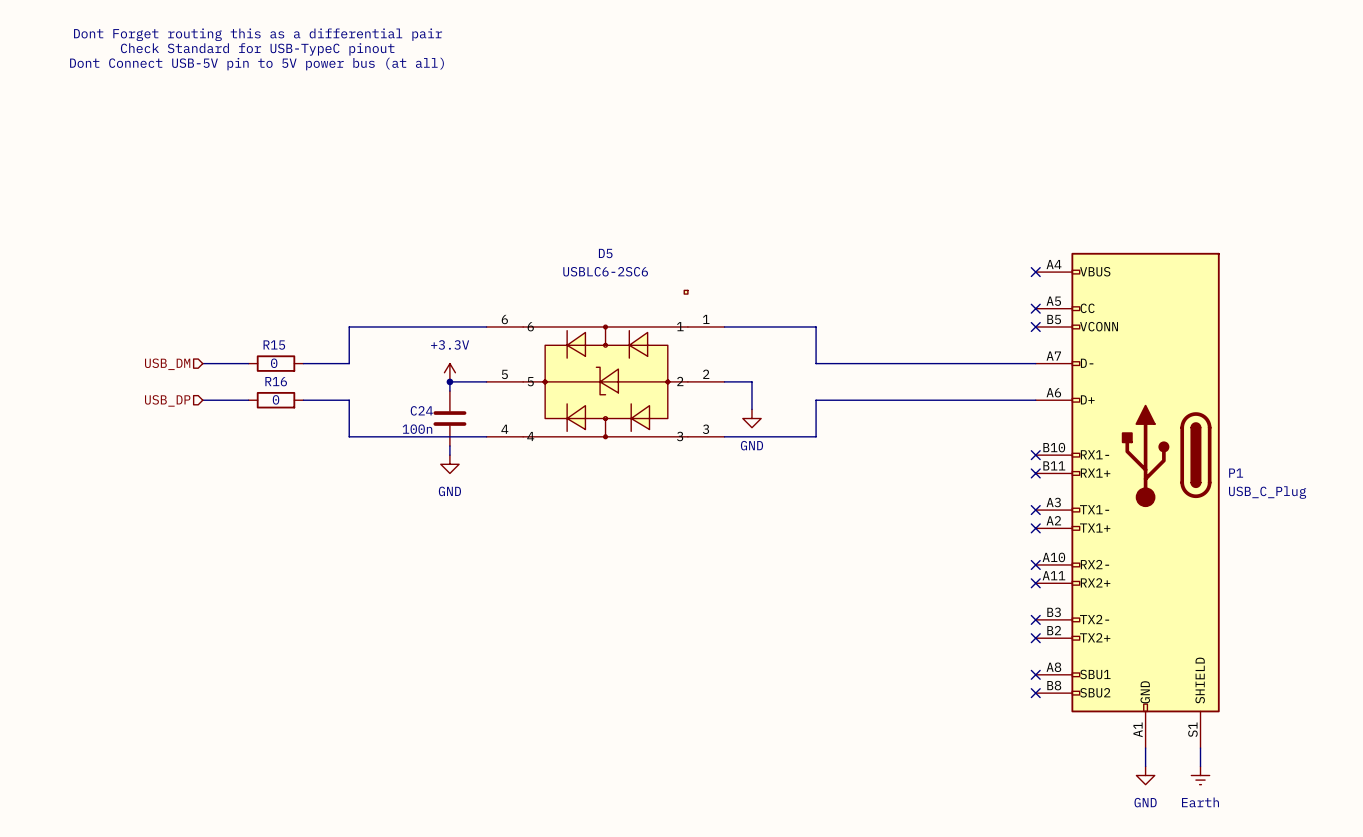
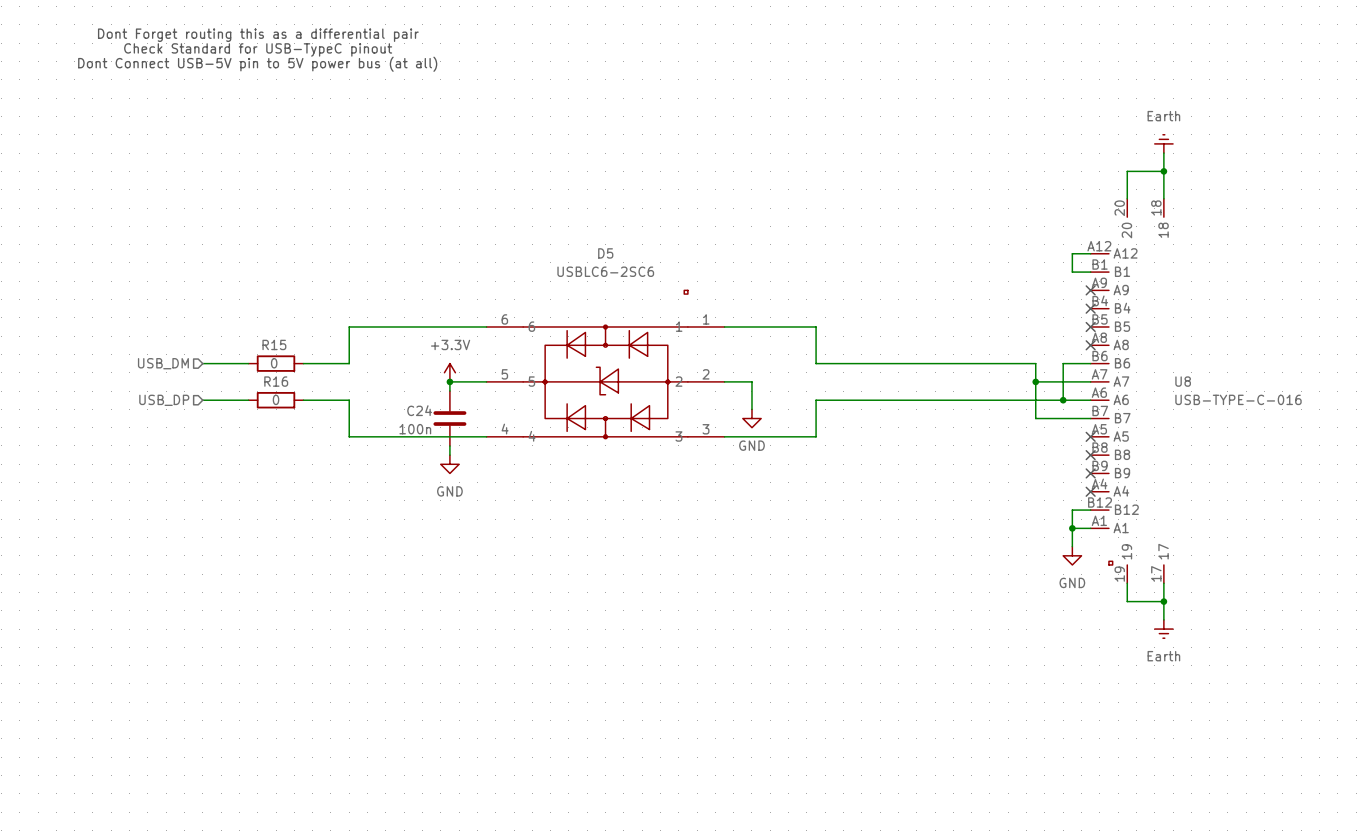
power symbol: none -> Earth (1163, 143)
wire: none -> (1163, 153) (1163, 198)
wire: none -> (1163, 171) (1127, 171) (1127, 198)
junction: none -> (1163, 171)
no-connect mark: (1035, 272) -> none
no-connect mark: none -> (1090, 290)
no-connect mark: (1035, 308) -> none
no-connect mark: none -> (1090, 308)
no-connect mark: (1035, 326) -> none
no-connect mark: none -> (1090, 326)
no-connect mark: none -> (1090, 345)
wire: none -> (1035, 363) (1035, 418) (1090, 418)
wire: none -> (1090, 363) (1063, 363) (1063, 400)
wire: none -> (1035, 381) (1090, 381)
junction: none -> (1035, 381)
U8: none -> USB-TYPE-C-016 (1127, 391)
junction: none -> (1063, 400)
no-connect mark: none -> (1090, 436)
no-connect mark: (1035, 455) -> none
no-connect mark: none -> (1090, 455)
no-connect mark: (1035, 473) -> none
no-connect mark: none -> (1090, 473)
no-connect mark: none -> (1090, 491)
P1: USB_C_Plug (1127, 500) -> none
no-connect mark: (1035, 510) -> none
no-connect mark: (1035, 528) -> none
junction: none -> (1072, 528)
power symbol: none -> GND (1072, 555)
no-connect mark: (1035, 564) -> none
no-connect mark: (1035, 583) -> none
junction: none -> (1163, 601)
no-connect mark: (1035, 619) -> none
no-connect mark: (1035, 638) -> none
no-connect mark: (1035, 674) -> none
no-connect mark: (1035, 693) -> none
wire: (1145, 748) (1145, 766) -> none
wire: (1200, 748) (1200, 766) -> none
power symbol: GND (1145, 775) -> none
power symbol position: Earth (1200, 775) -> Earth (1163, 629)

